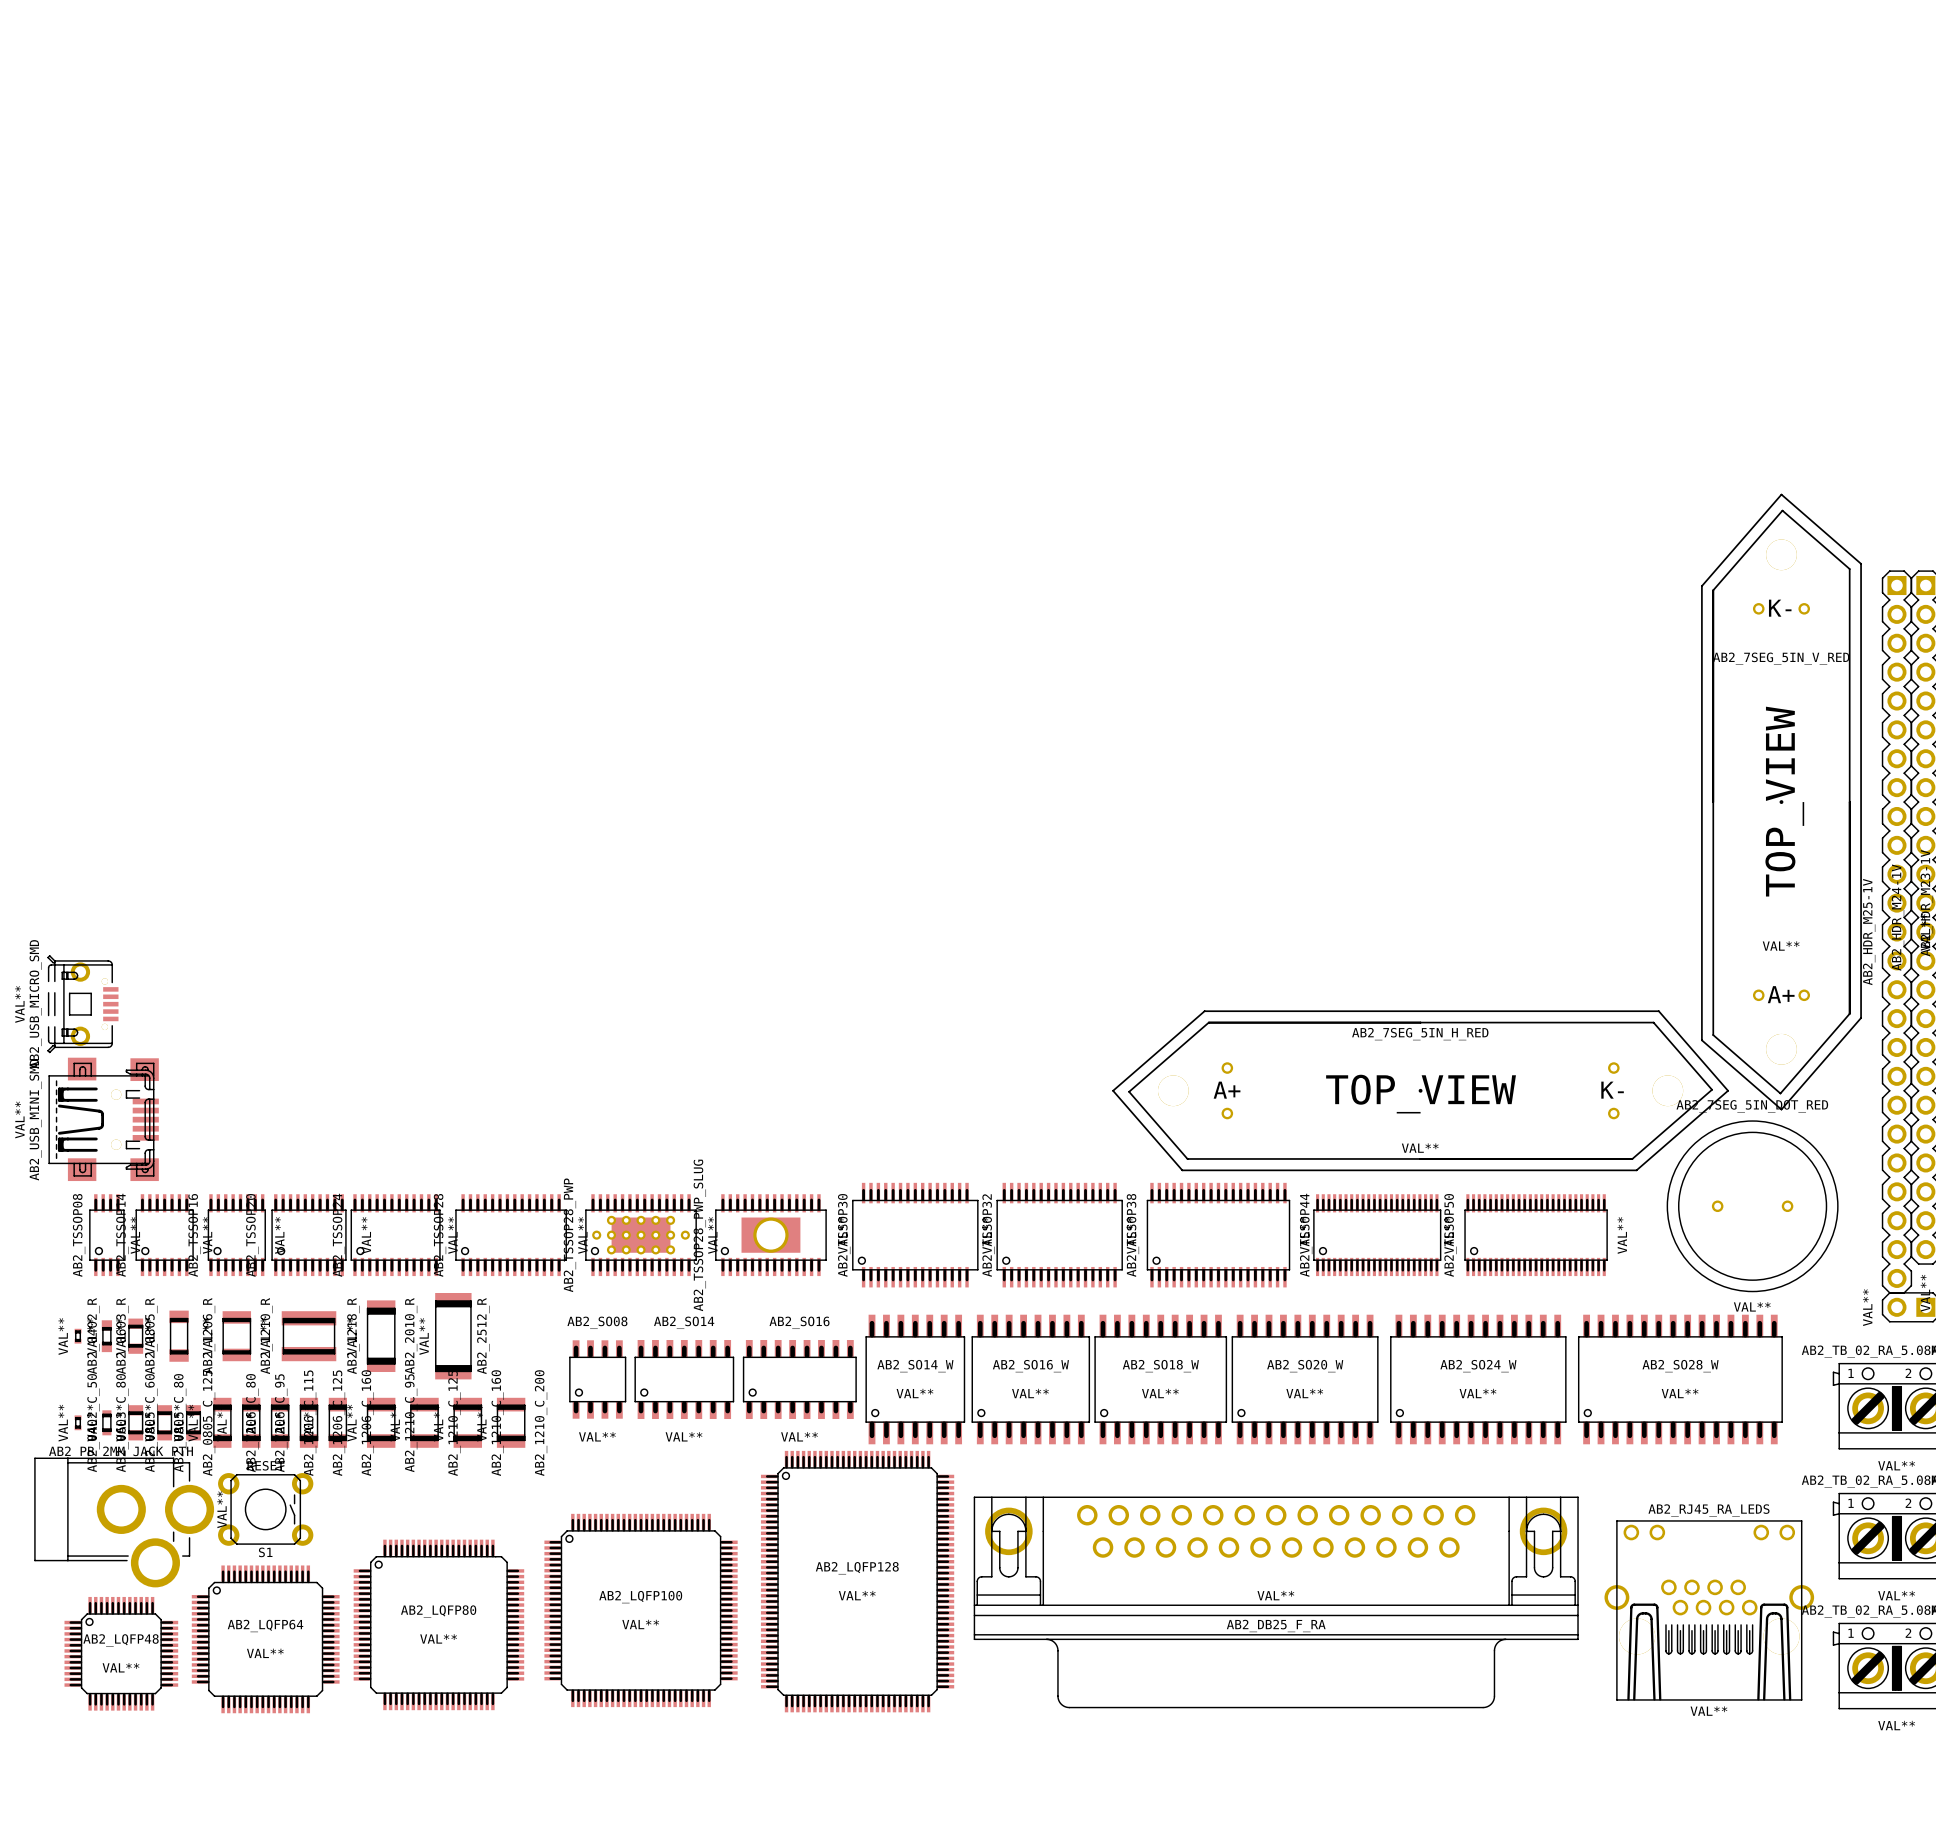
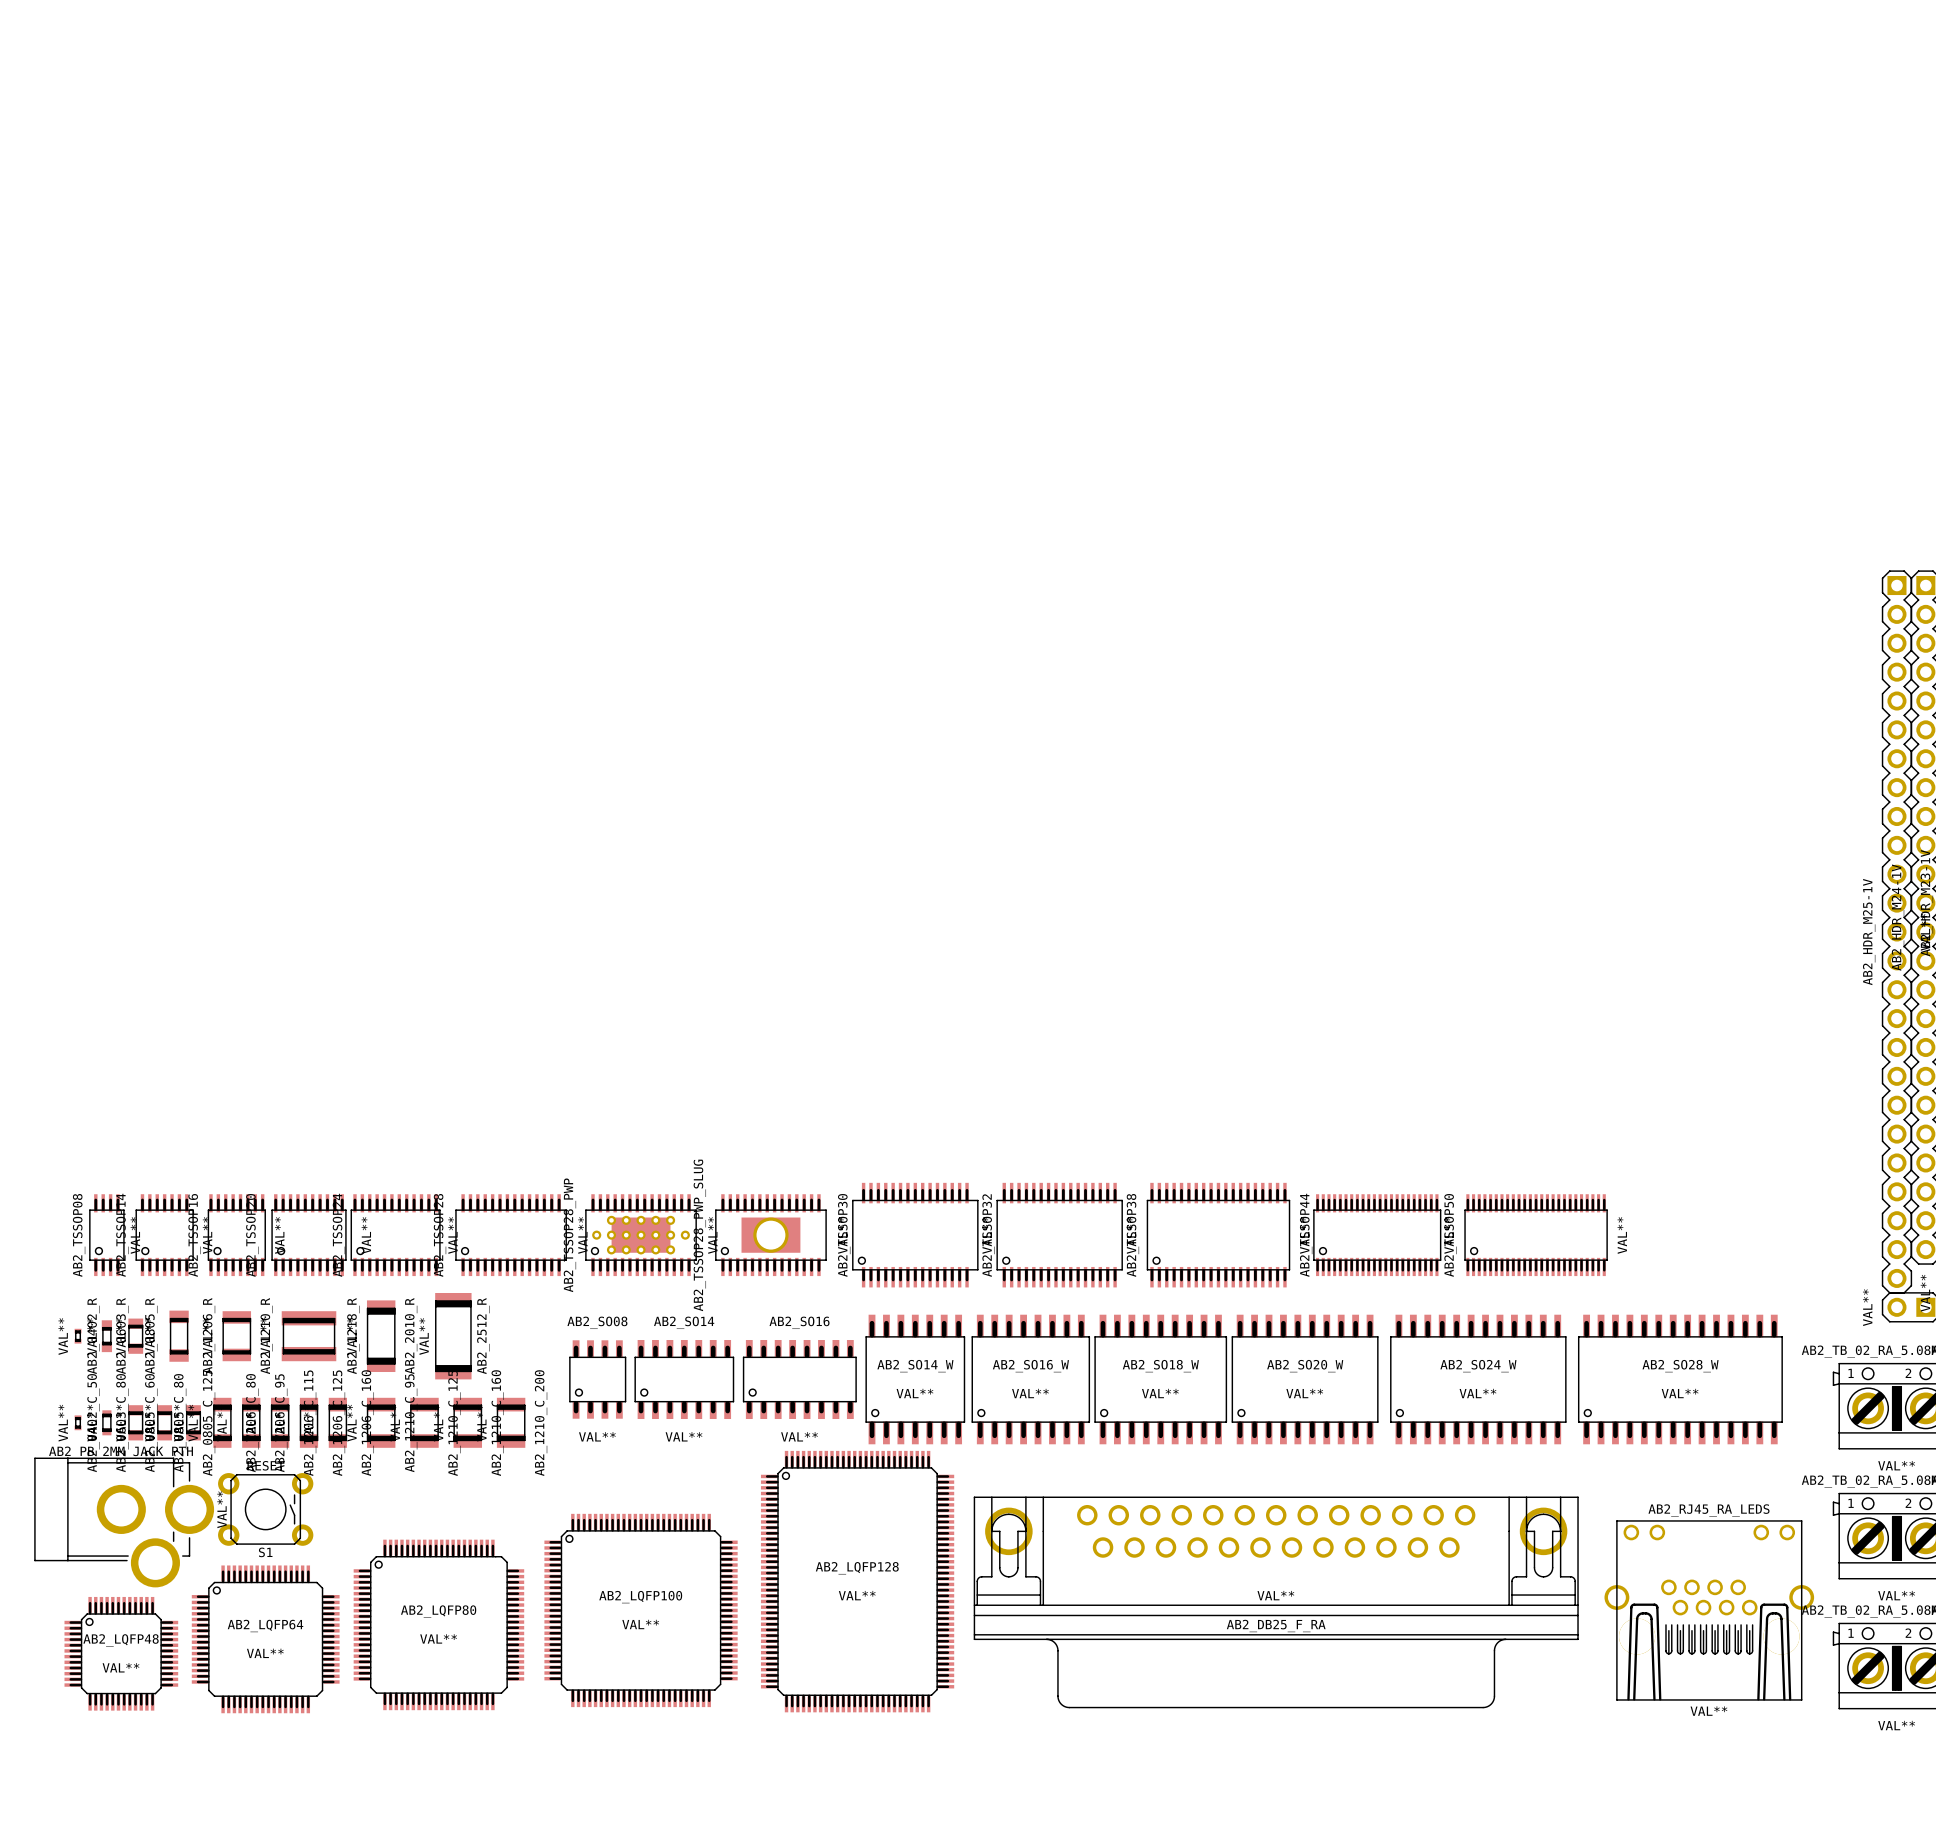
AB2_7SEG_5IN_V_RED: VAL** (1781, 802) -> none
AB2_USB_MICRO_SMD: VAL** (83, 1004) -> none
AB2_7SEG_5IN_H_RED: VAL** (1420, 1090) -> none
AB2_USB_MINI_SMD: VAL** (103, 1119) -> none
AB2_7SEG_5IN_DOT_RED: VAL** (1752, 1206) -> none

